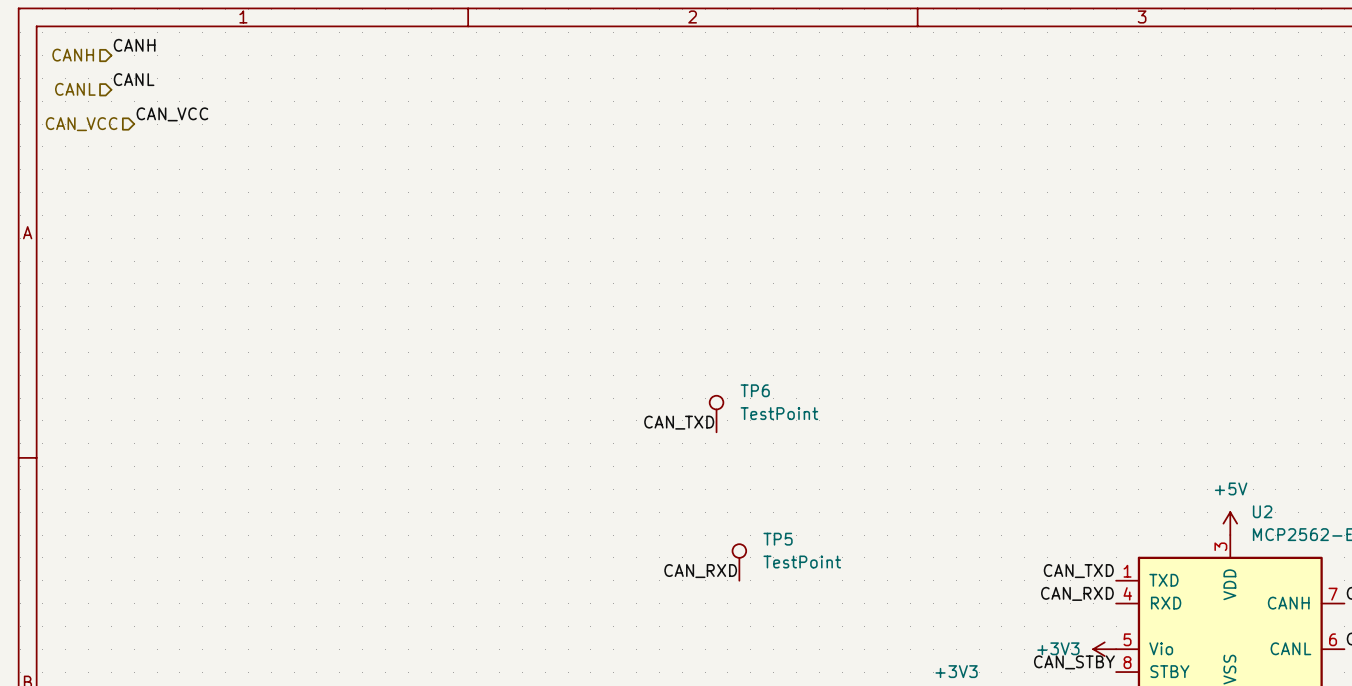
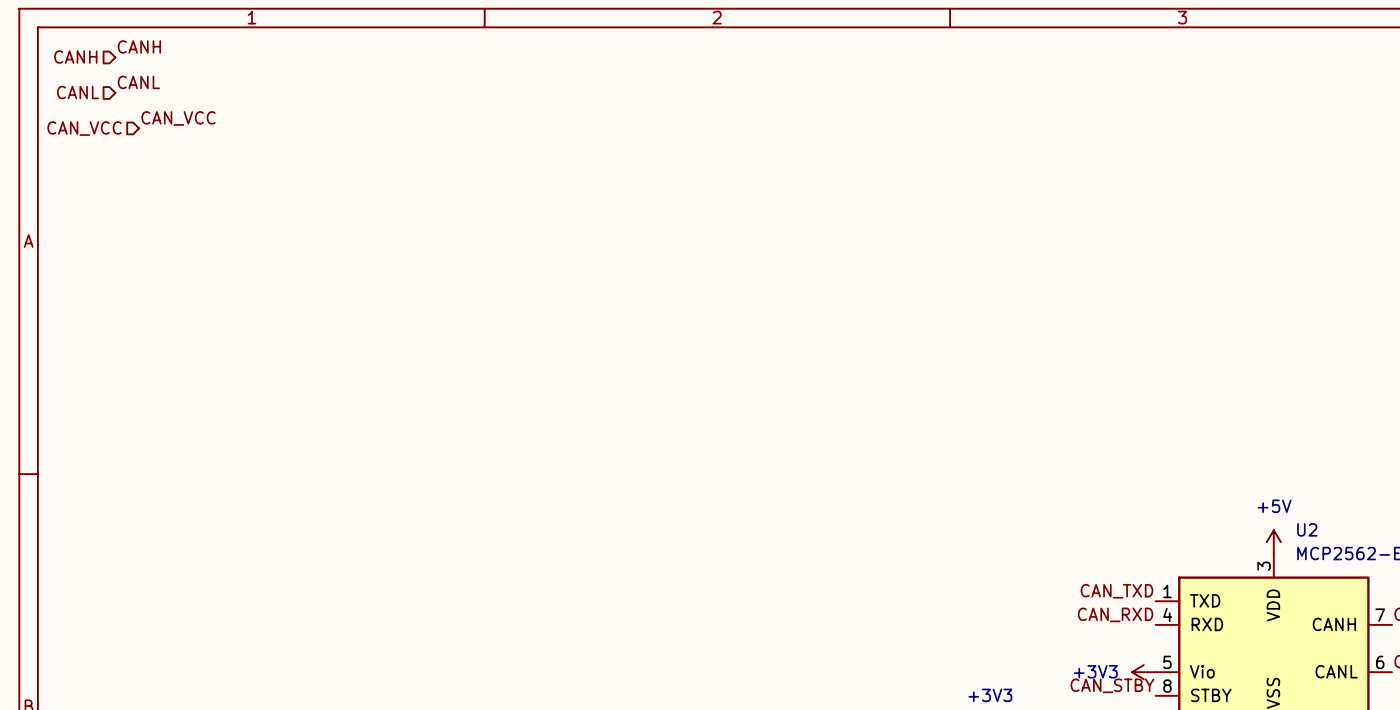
TP6: TestPoint (716, 414) -> none
label: CAN_TXD (679, 422) -> none
TP5: TestPoint (739, 562) -> none
label: CAN_RXD (700, 571) -> none

